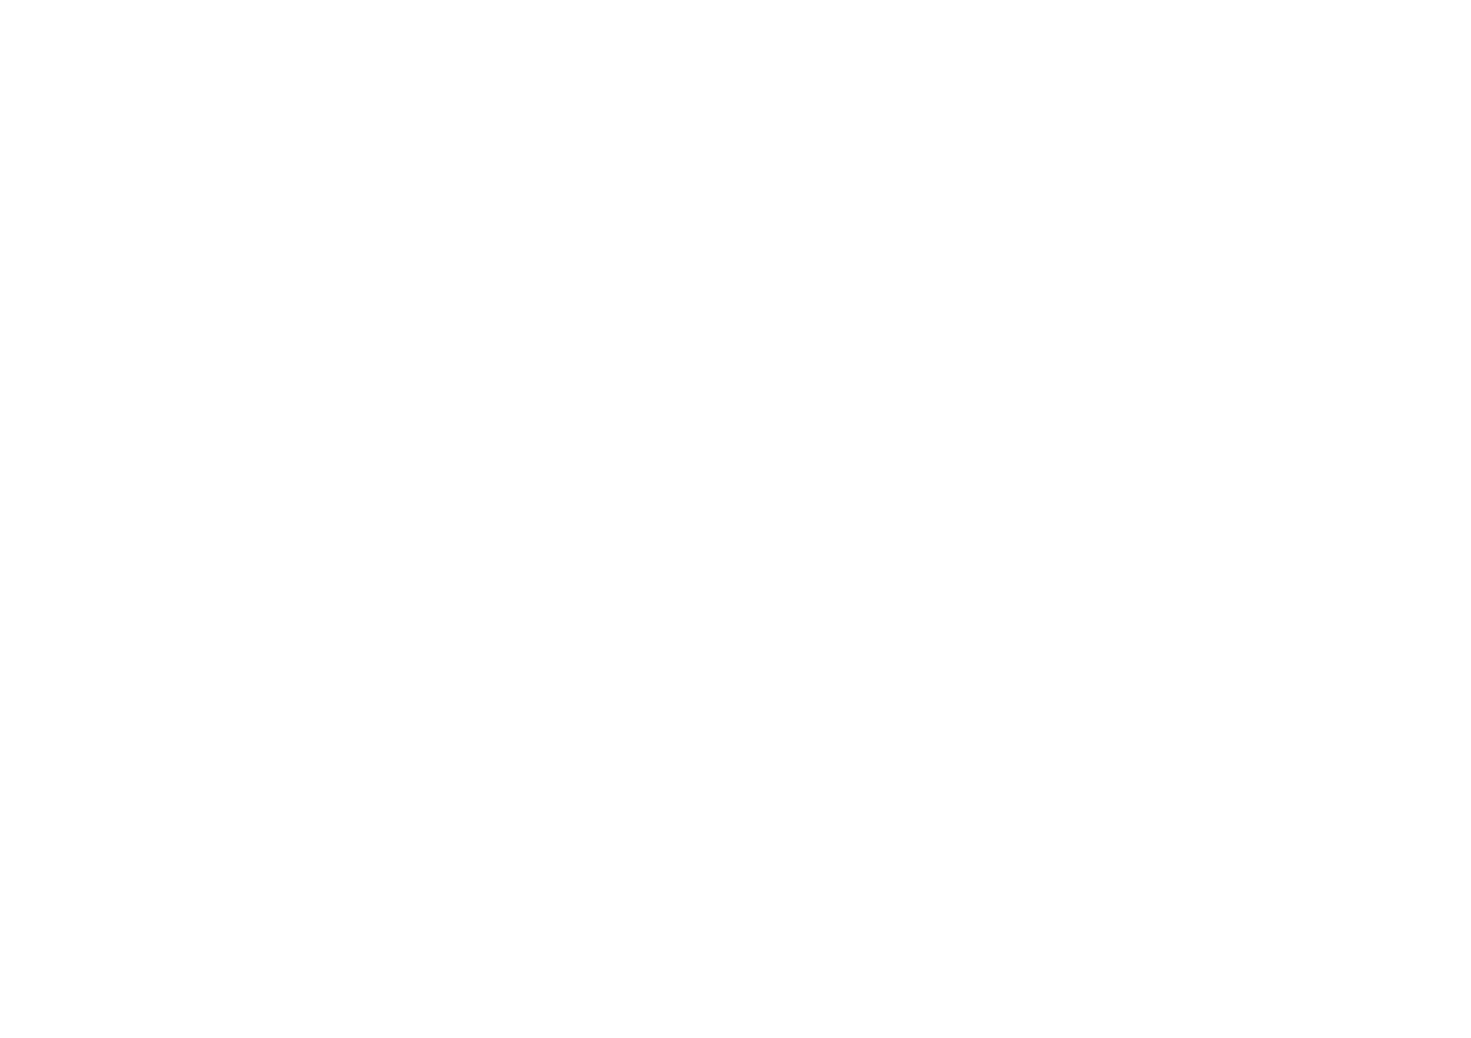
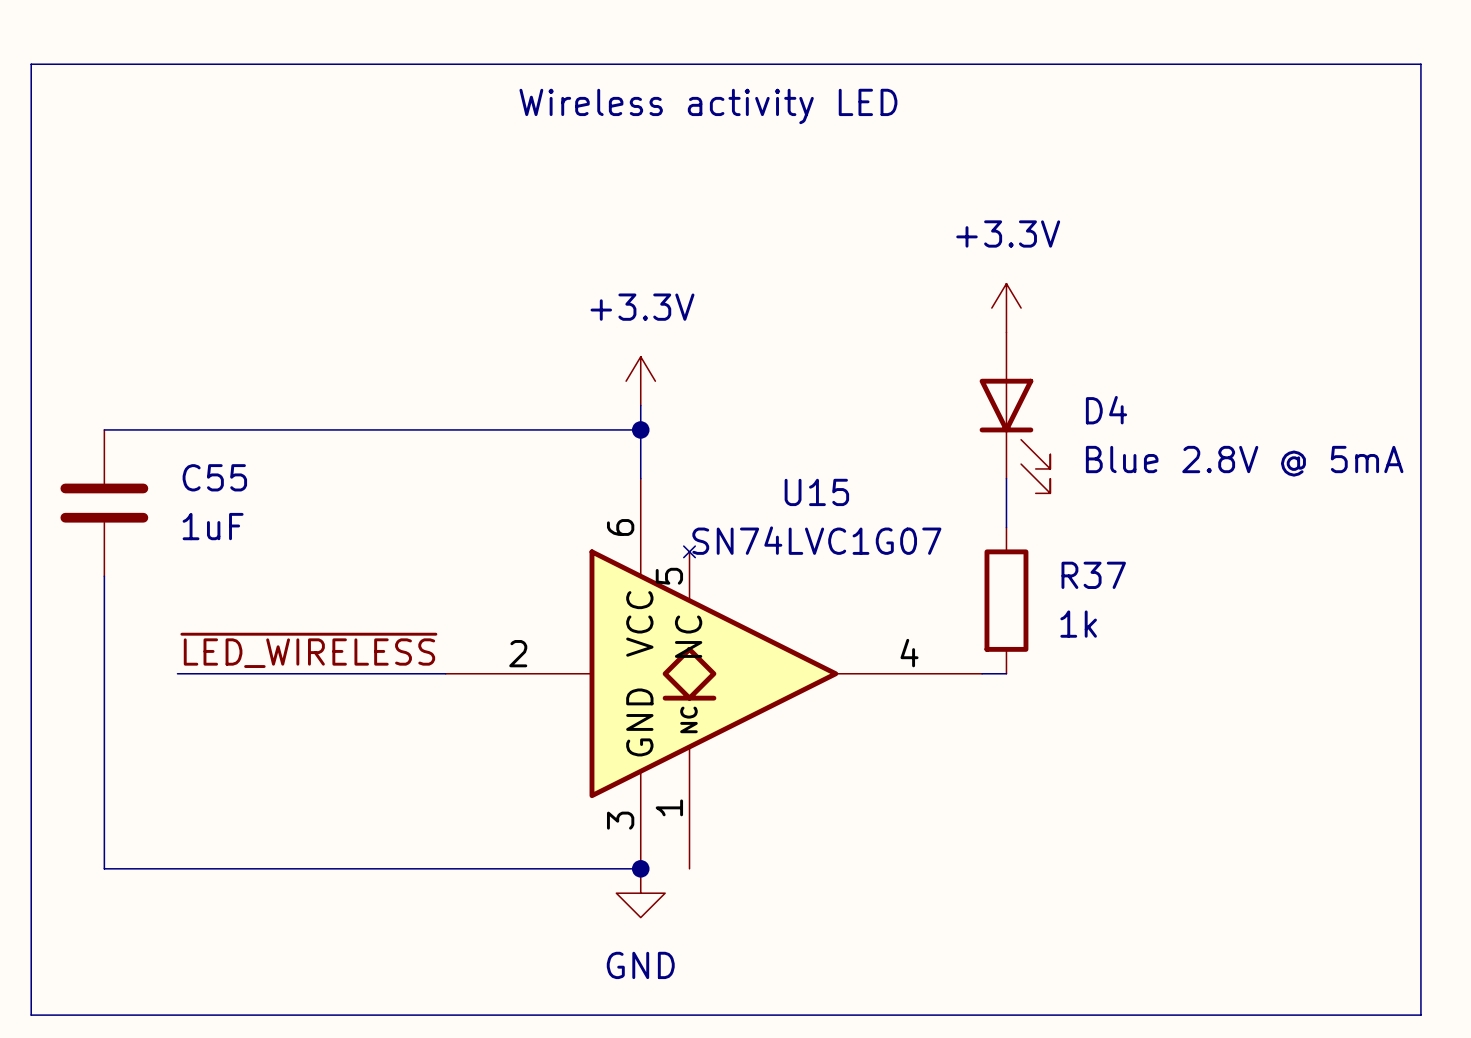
line: none -> (31, 64) (1420, 64) (1420, 1015) (31, 1015) (31, 64)
text: none -> Wireless activity LED (708, 106)
power symbol: none -> +3.3V (1006, 308)
power symbol: none -> +3.3V (640, 381)
wire: none -> (640, 405) (640, 478)
D4: none -> Blue 2.8V @ 5mA (1015, 412)
wire: none -> (104, 429) (640, 429)
junction: none -> (640, 429)
wire: none -> (1006, 478) (1006, 527)
C55: none -> 1uF (104, 503)
wire: none -> (104, 576) (104, 868) (640, 868)
R37: none -> 1k (1006, 600)
label: none -> ~{LED_WIRELESS} (308, 650)
wire: none -> (177, 673) (445, 673)
U15: none -> SN74LVC1G07 (713, 673)
wire: none -> (982, 673) (1006, 673)
junction: none -> (640, 868)
power symbol: none -> GND (640, 893)

